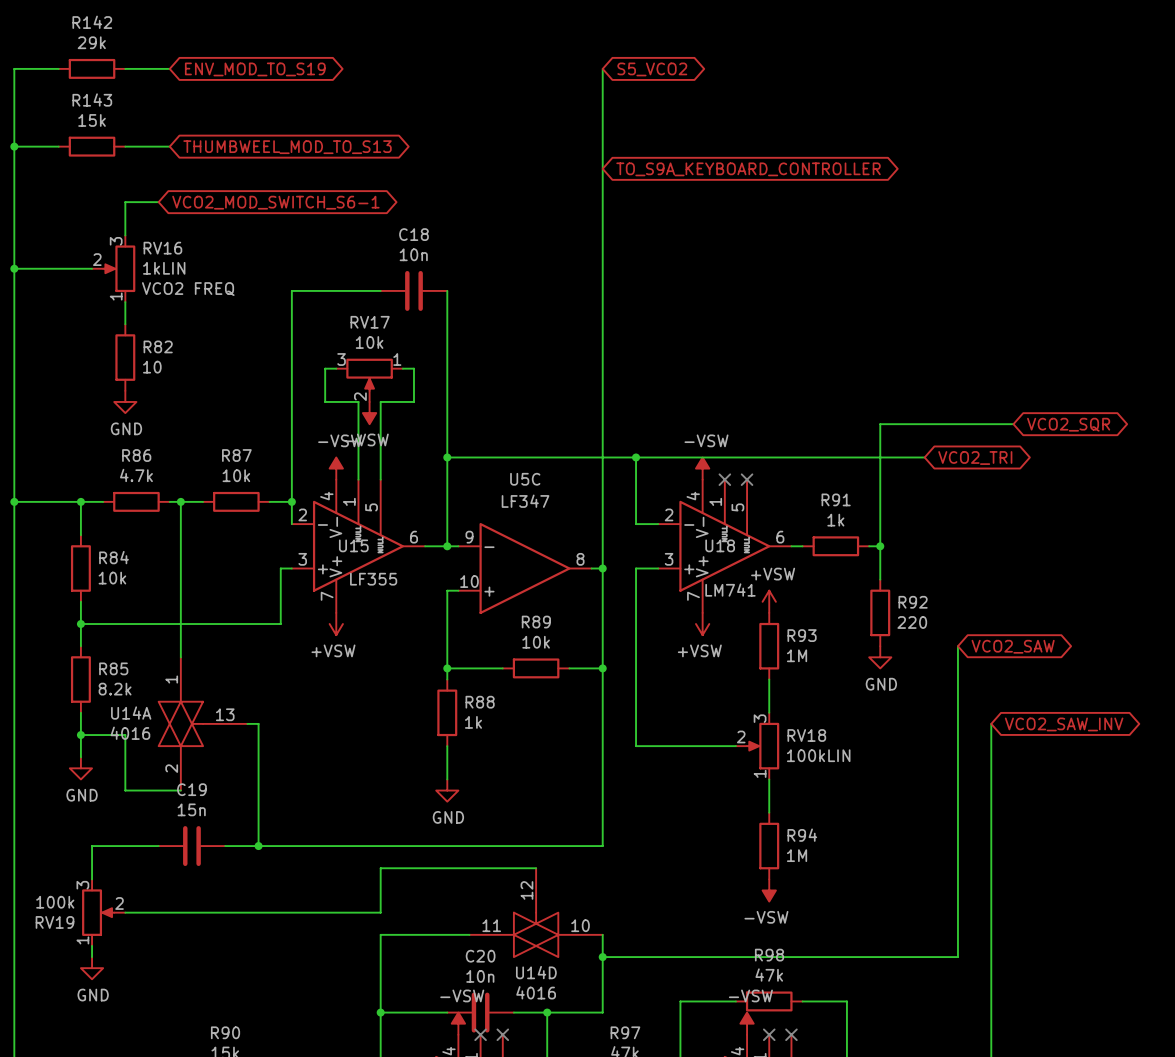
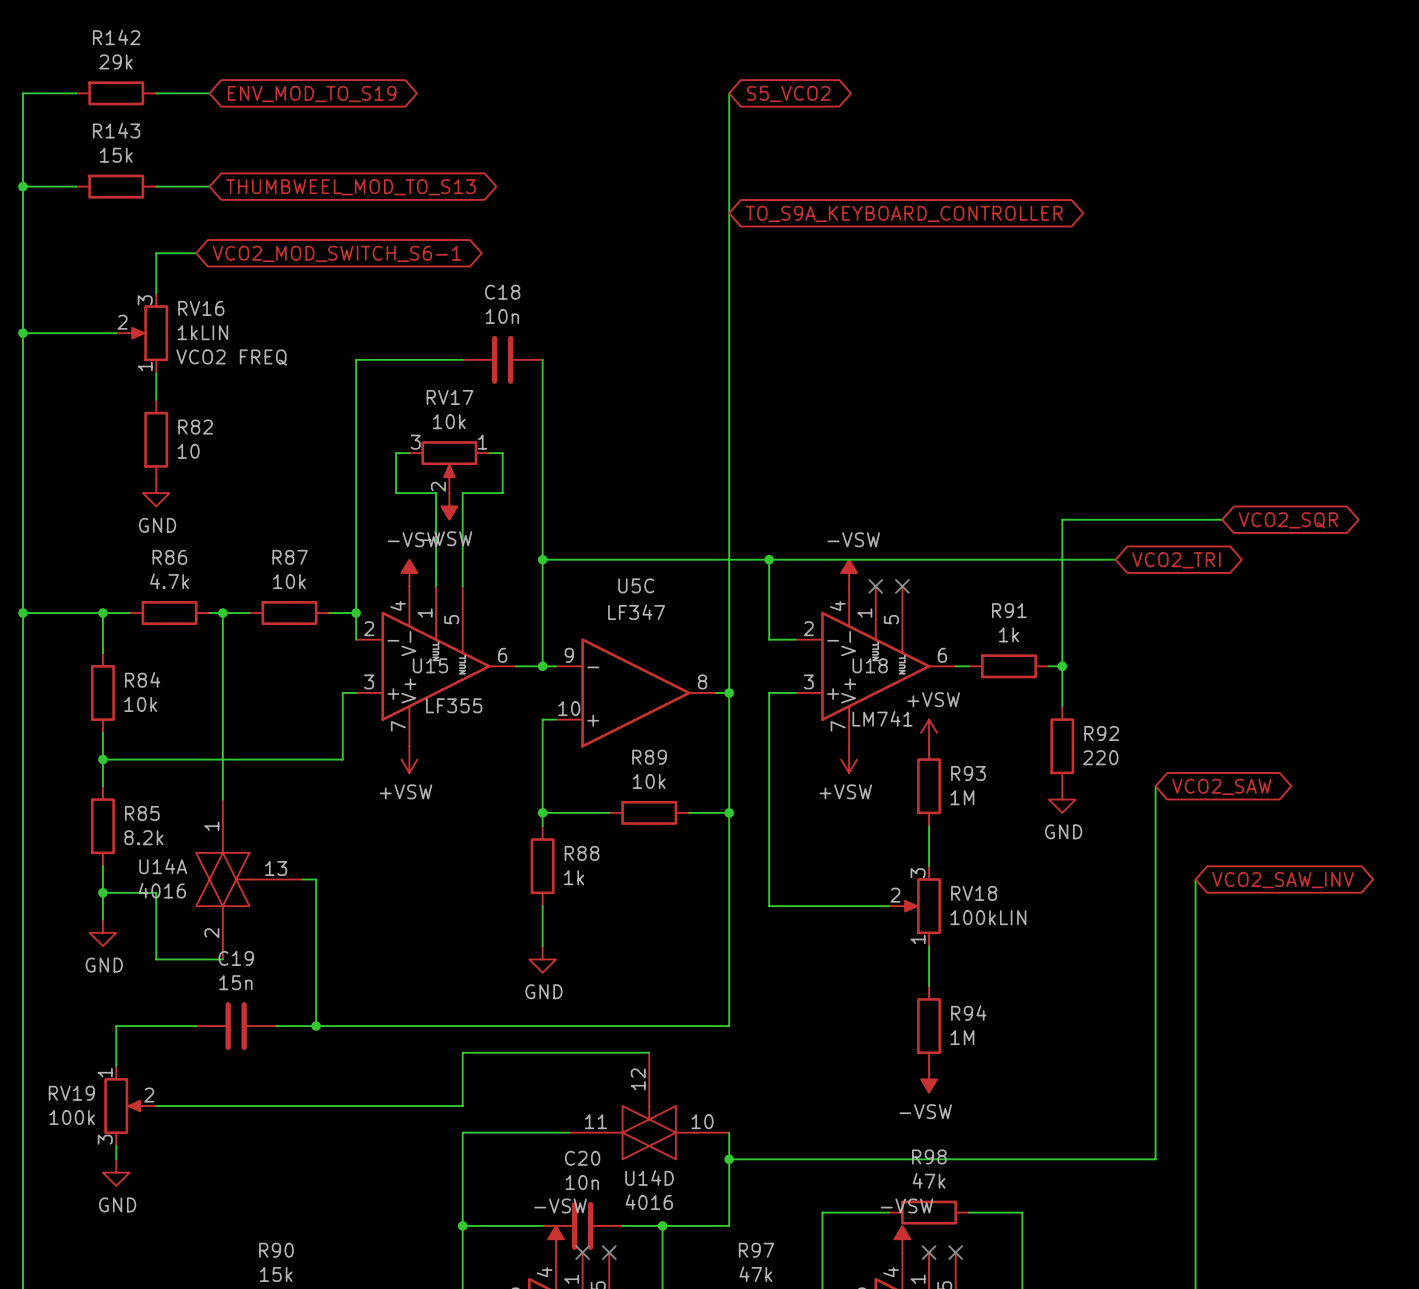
RV19 flip: as is (98, 912) -> up-down (123, 1106)

